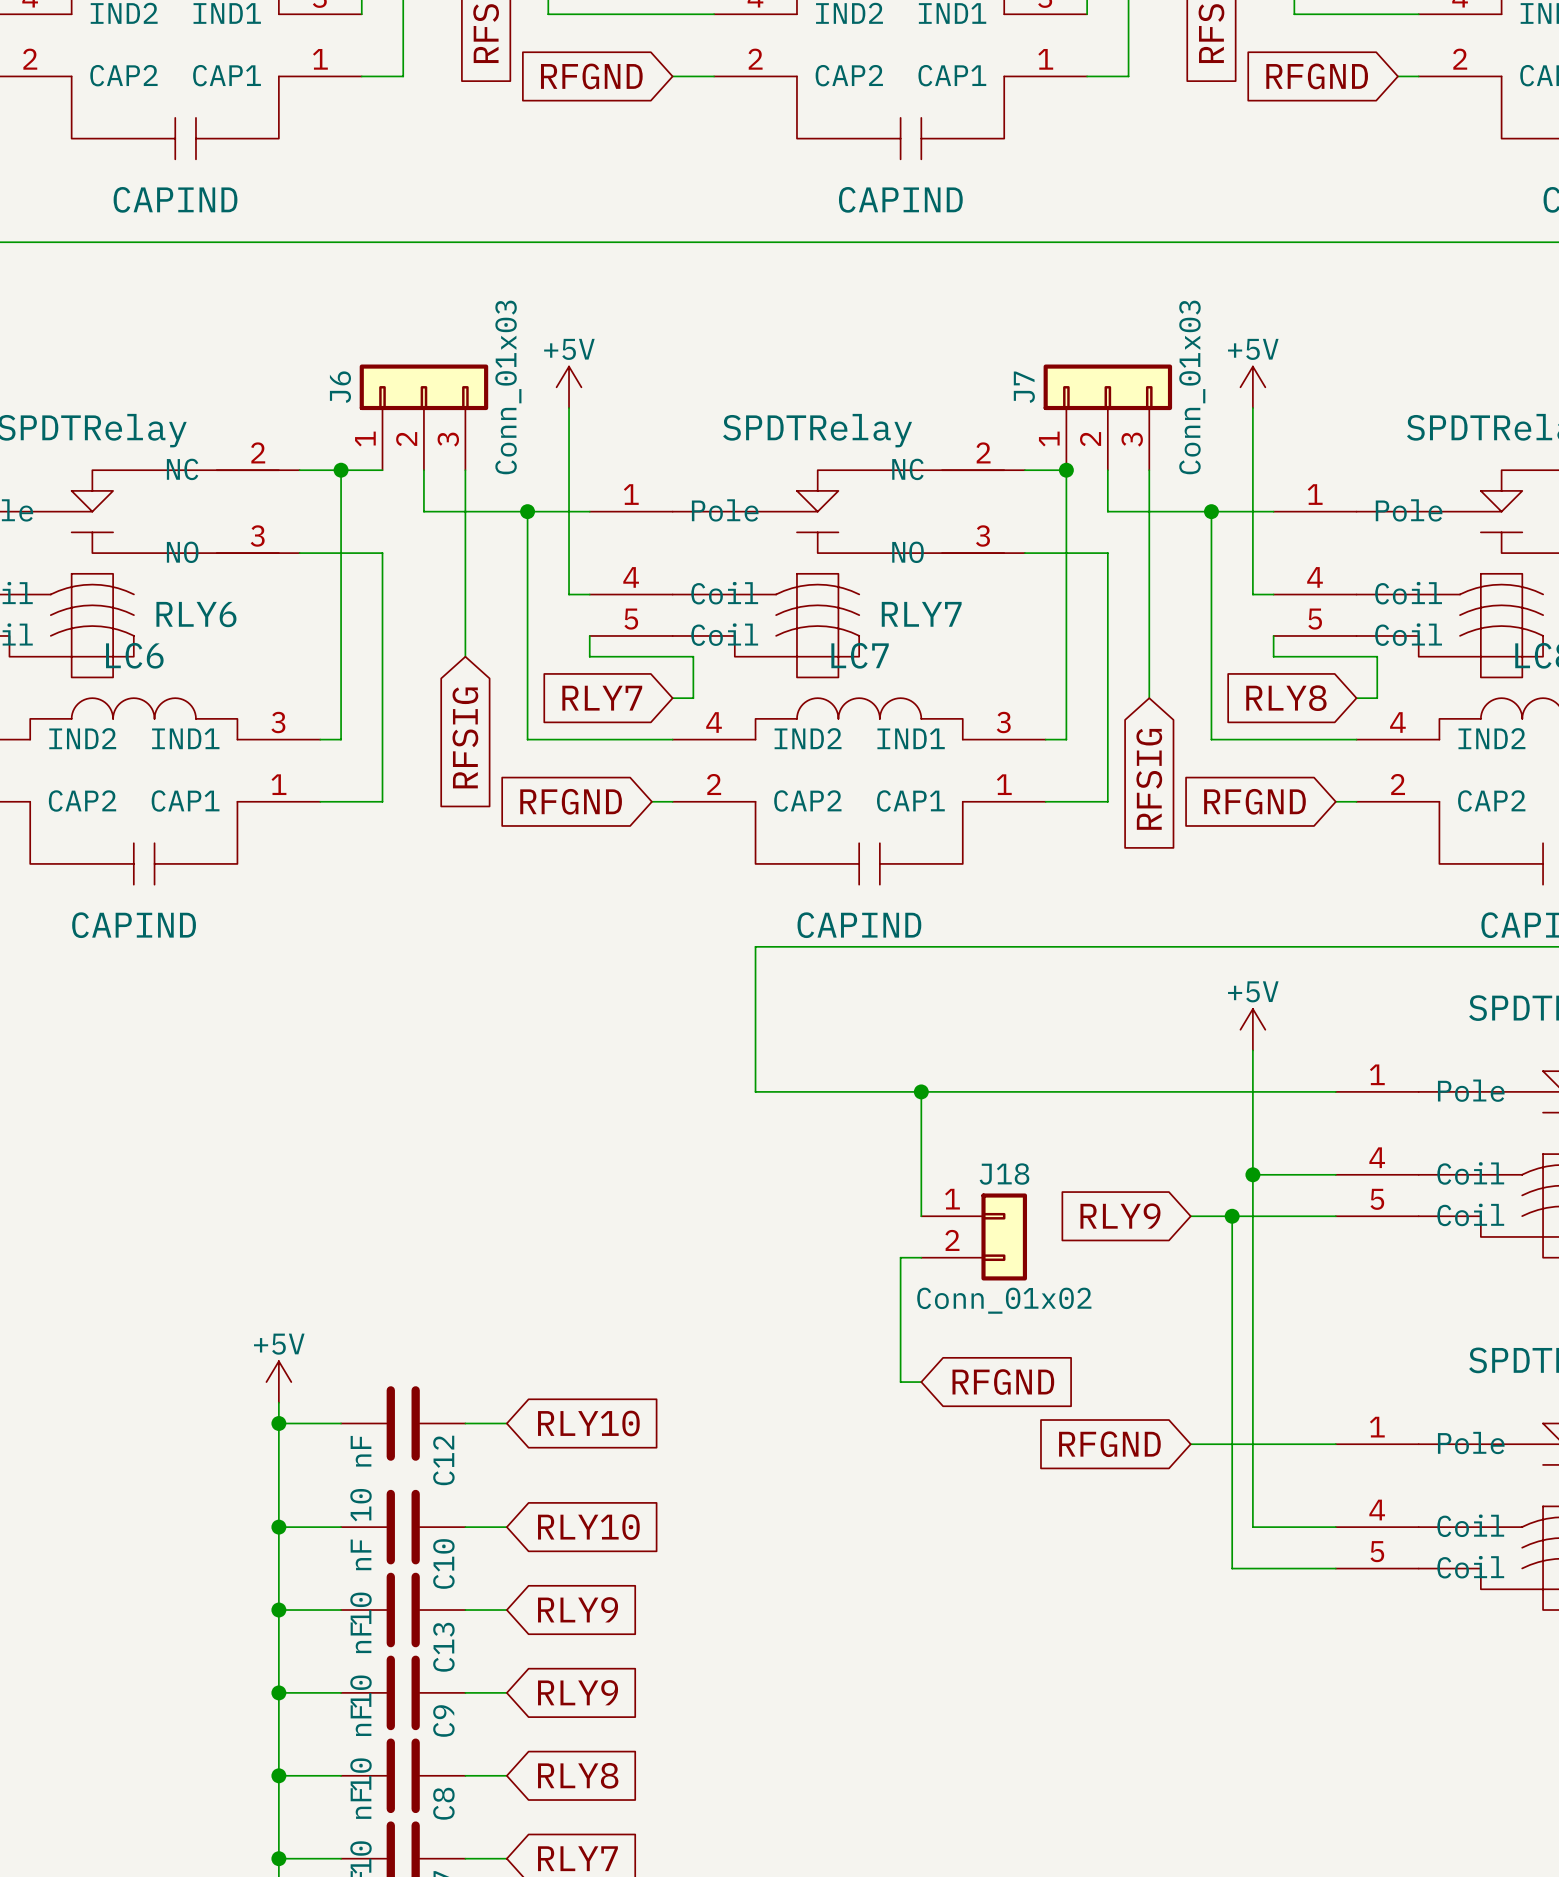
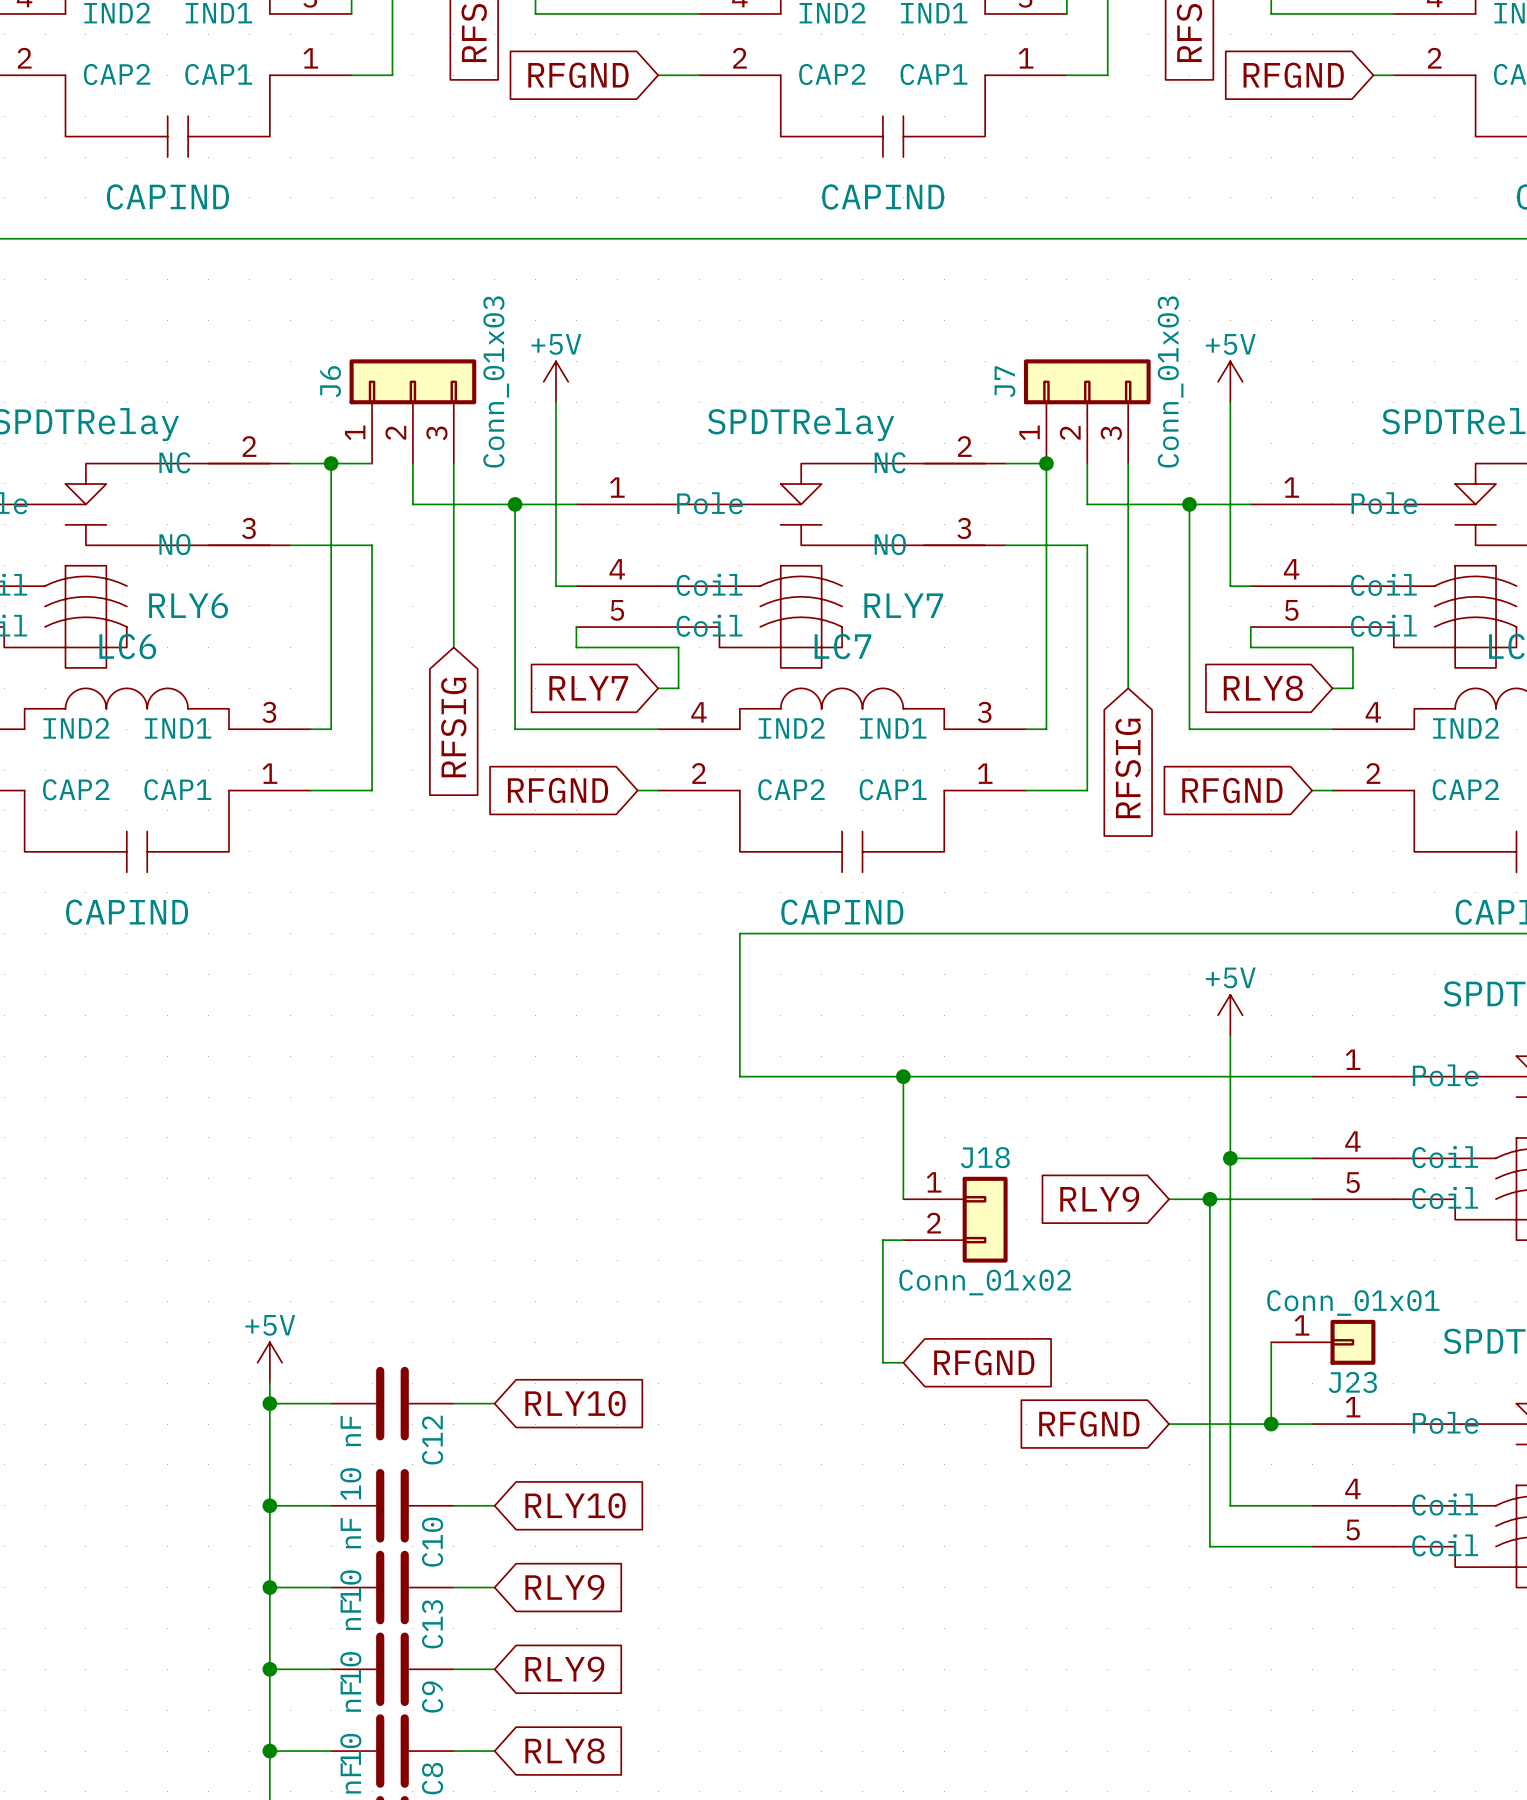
wire: none -> (1271, 1342) (1271, 1424)
J23: none -> Conn_01x01 (1323, 1342)
junction: none -> (1271, 1424)

